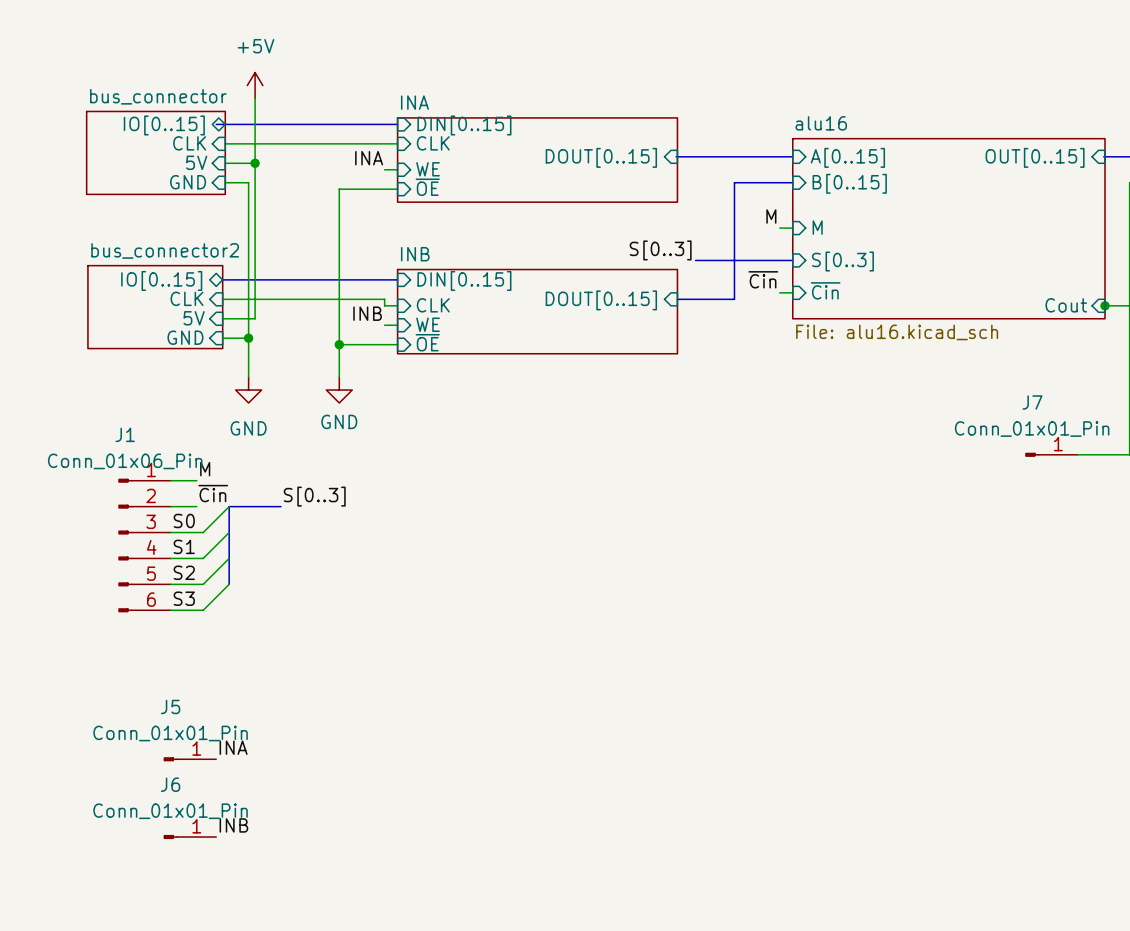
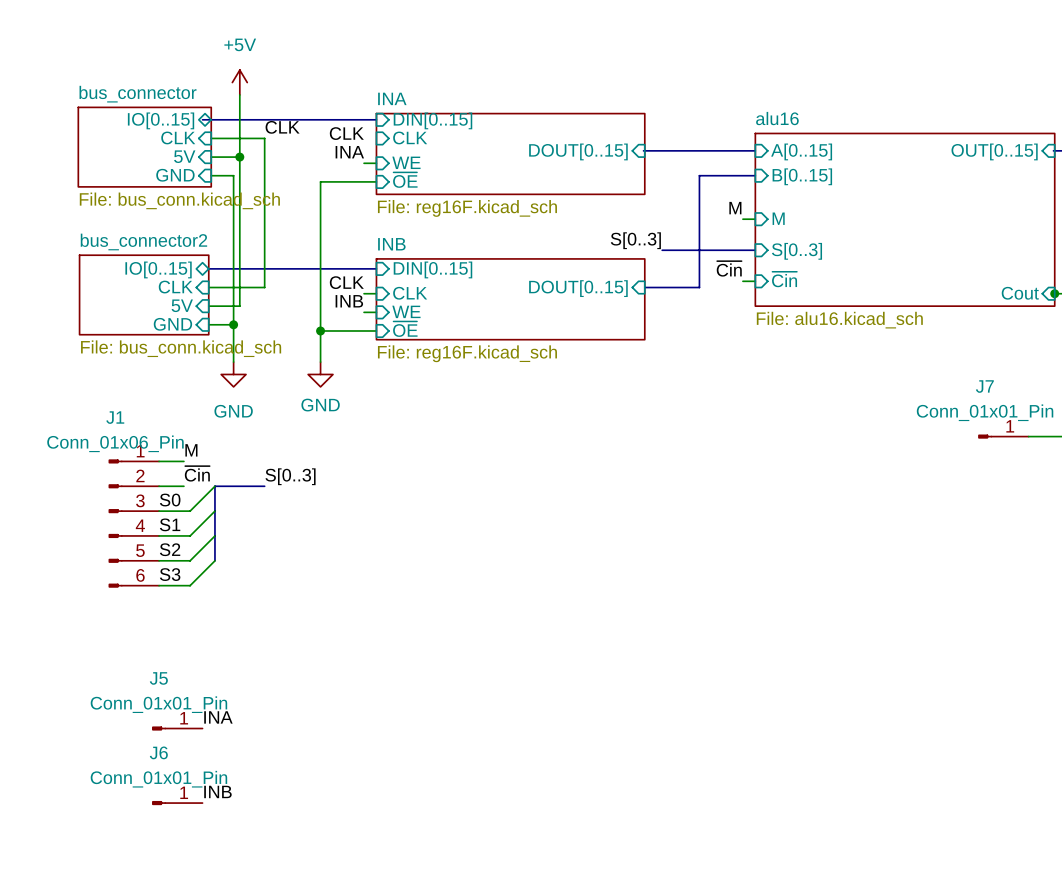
label: none -> CLK (282, 127)
label: none -> CLK (346, 133)
wire: (281, 143) (397, 143) -> none
sheet bus_connector value: none -> File: bus_conn.kicad_sch (179, 200)
sheet INA value: none -> File: reg16F.kicad_sch (467, 208)
label: none -> CLK (346, 282)
wire: (281, 299) (384, 299) (384, 305) -> (264, 287) (264, 138)
sheet bus_connector2 value: none -> File: bus_conn.kicad_sch (181, 348)
sheet INB value: none -> File: reg16F.kicad_sch (467, 353)

